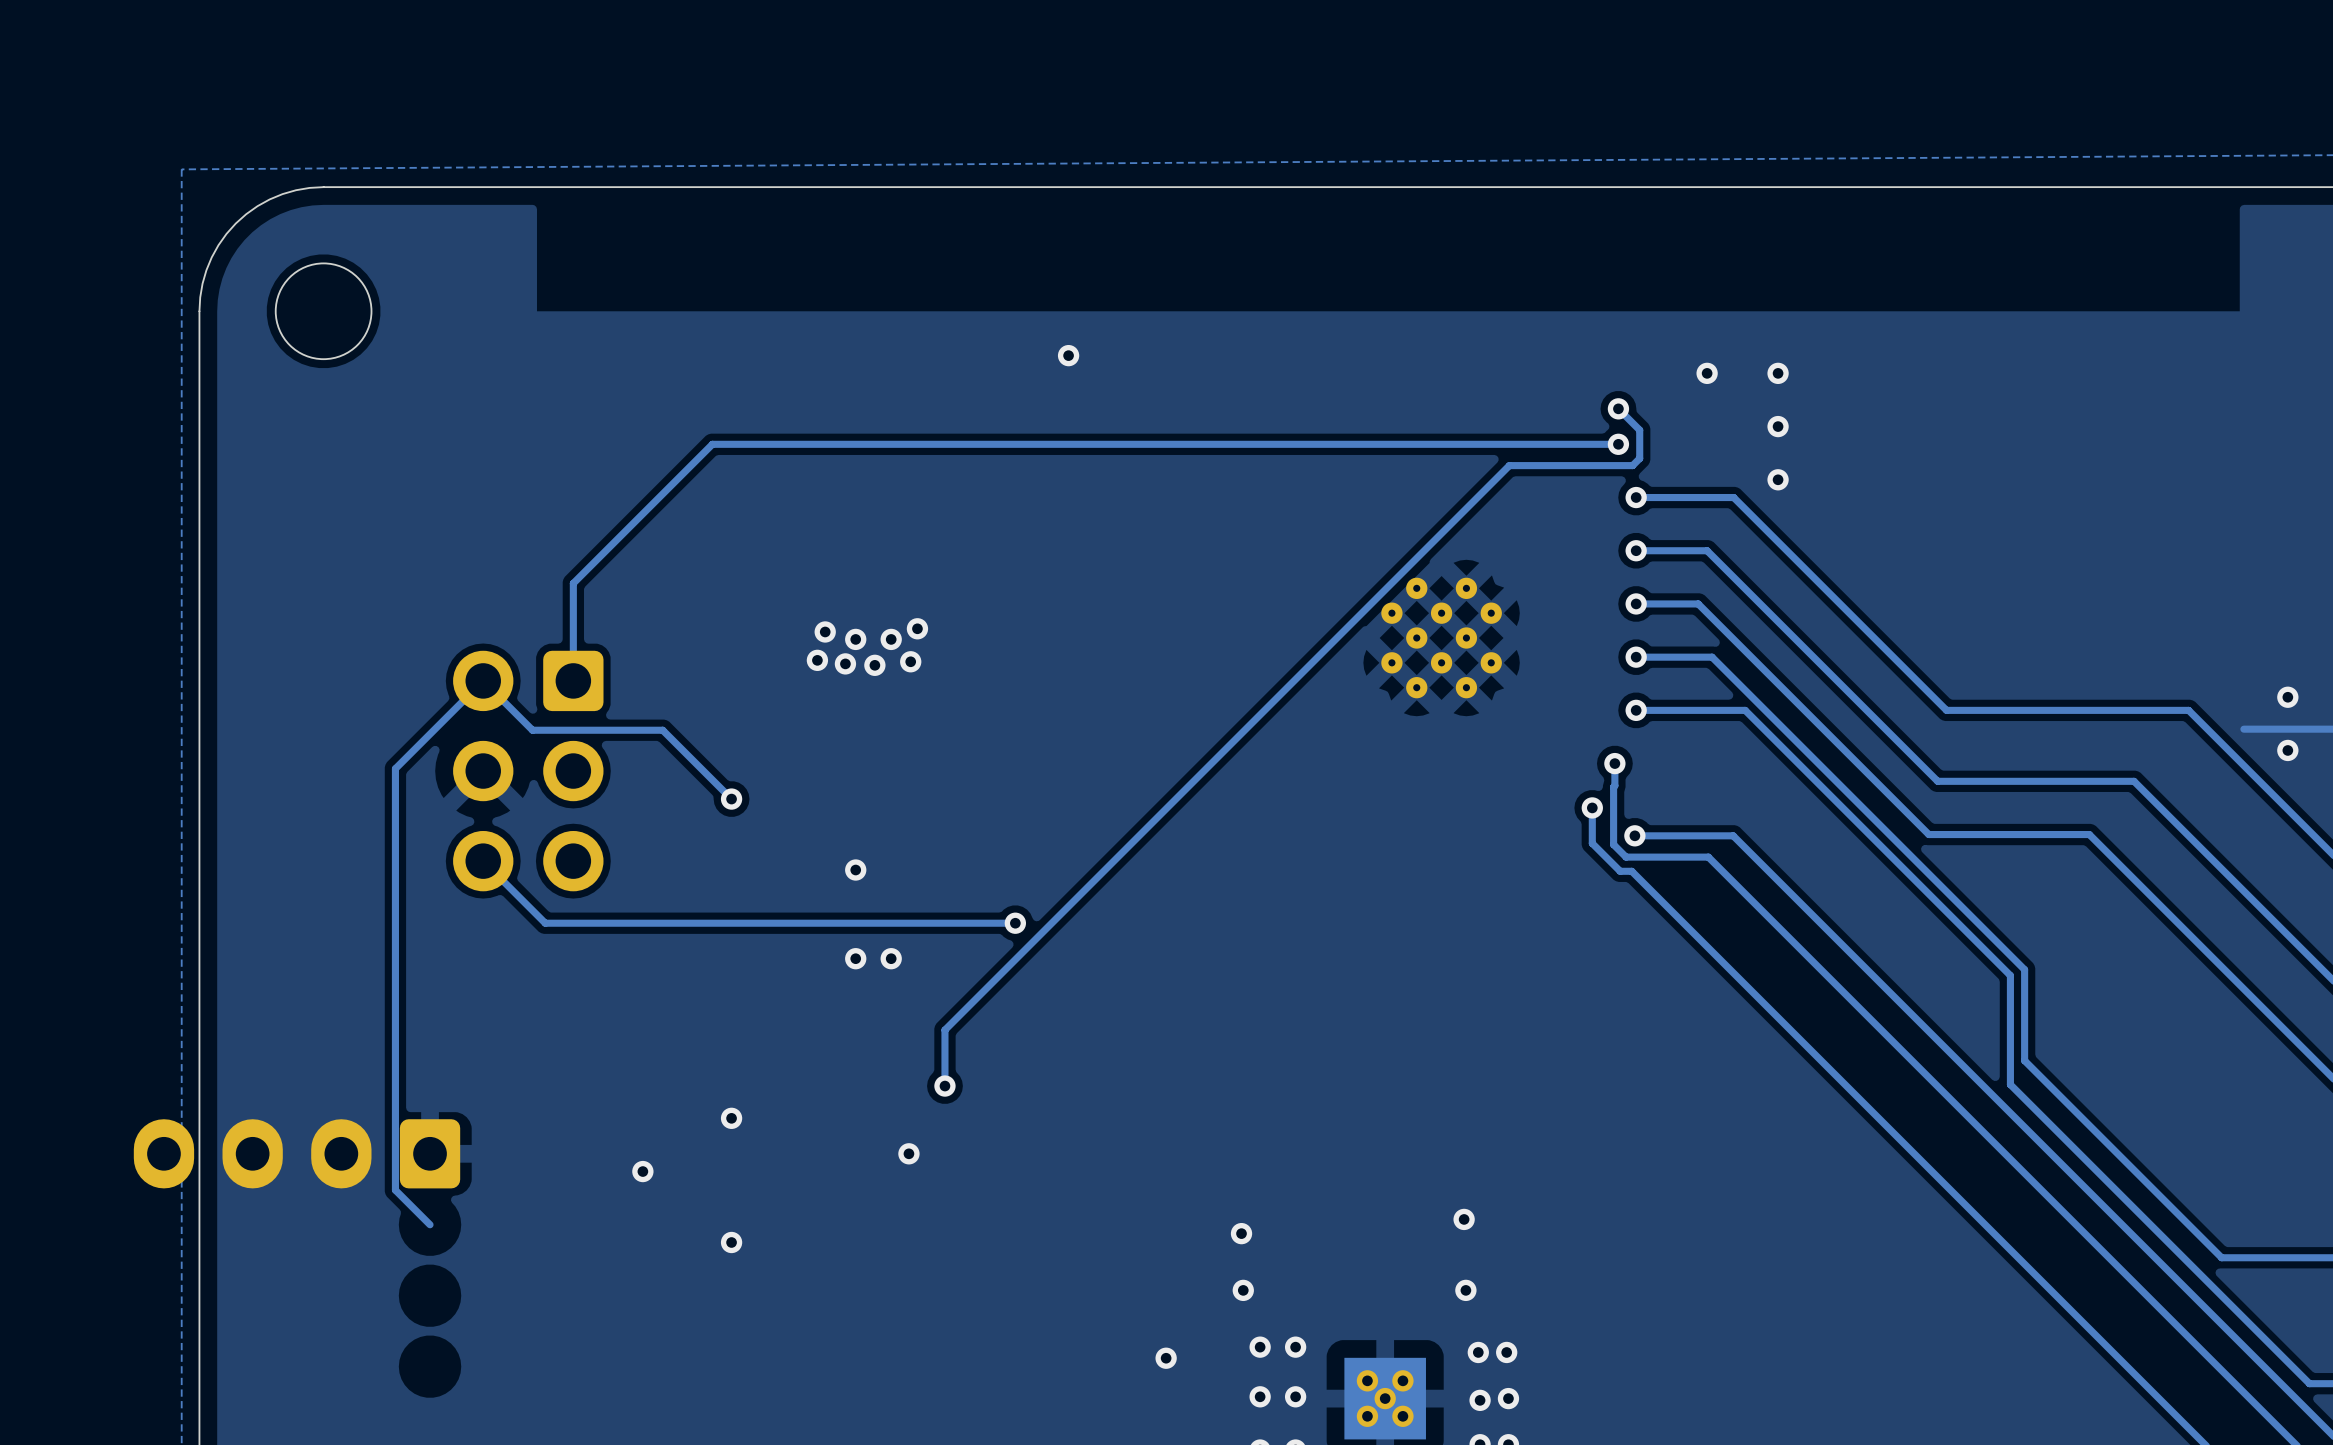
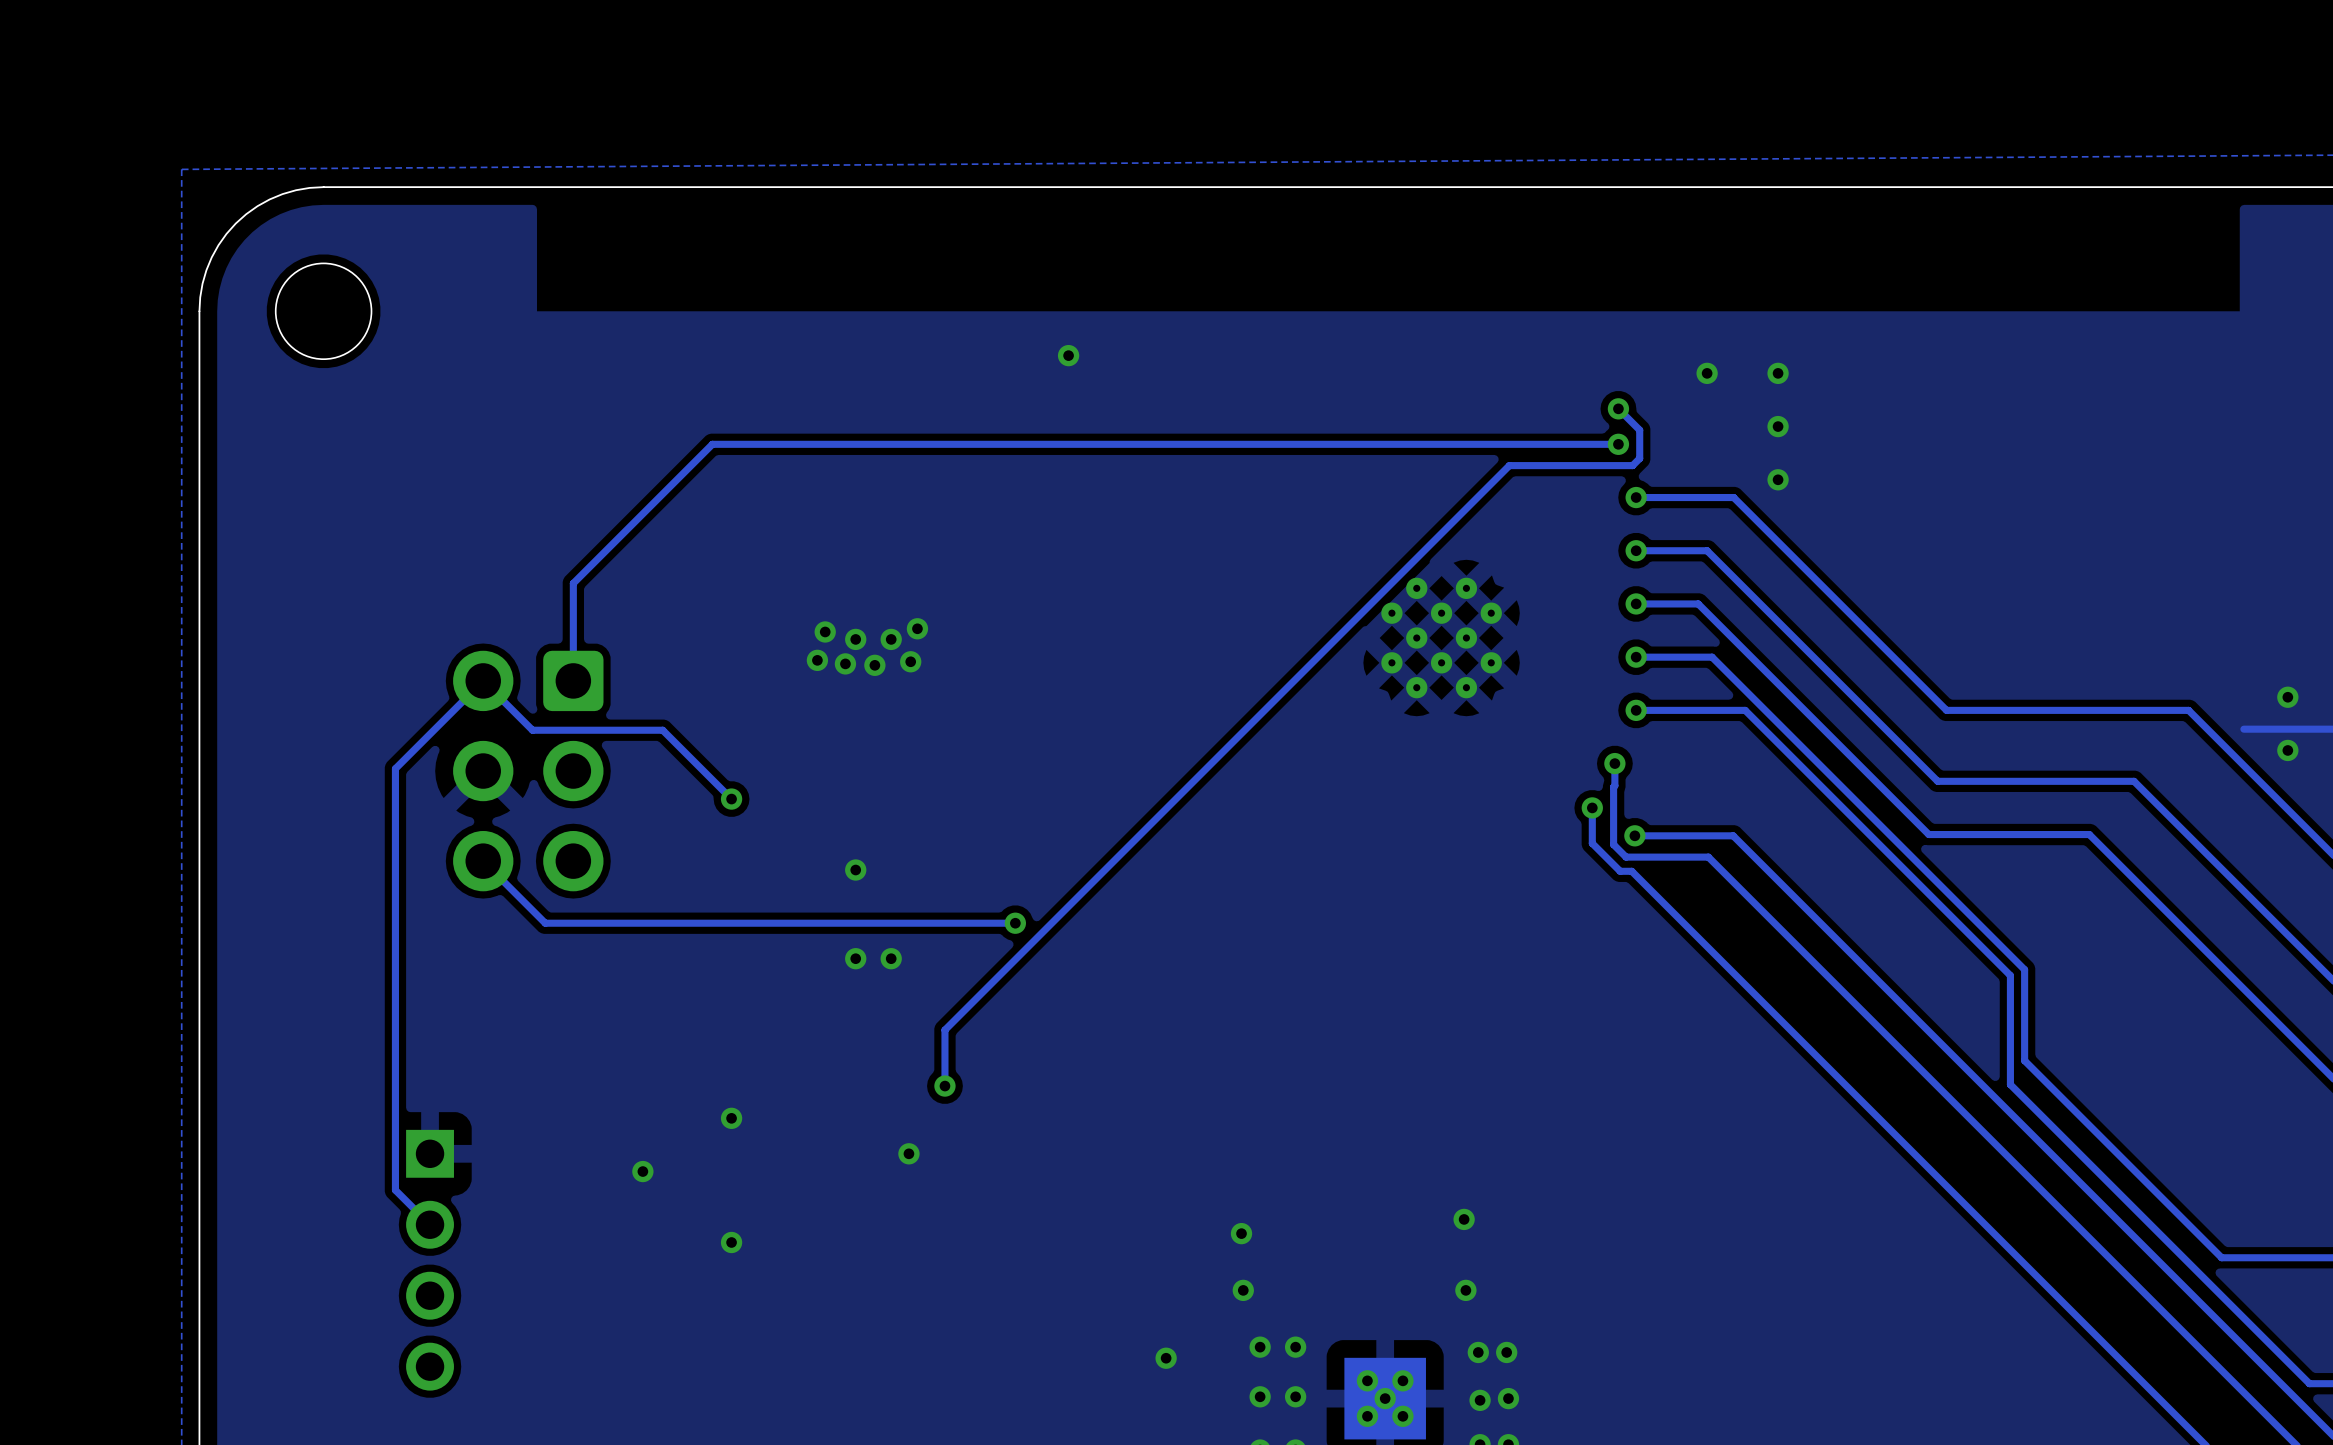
part: (297, 1153) -> none
part: none -> (430, 1260)

